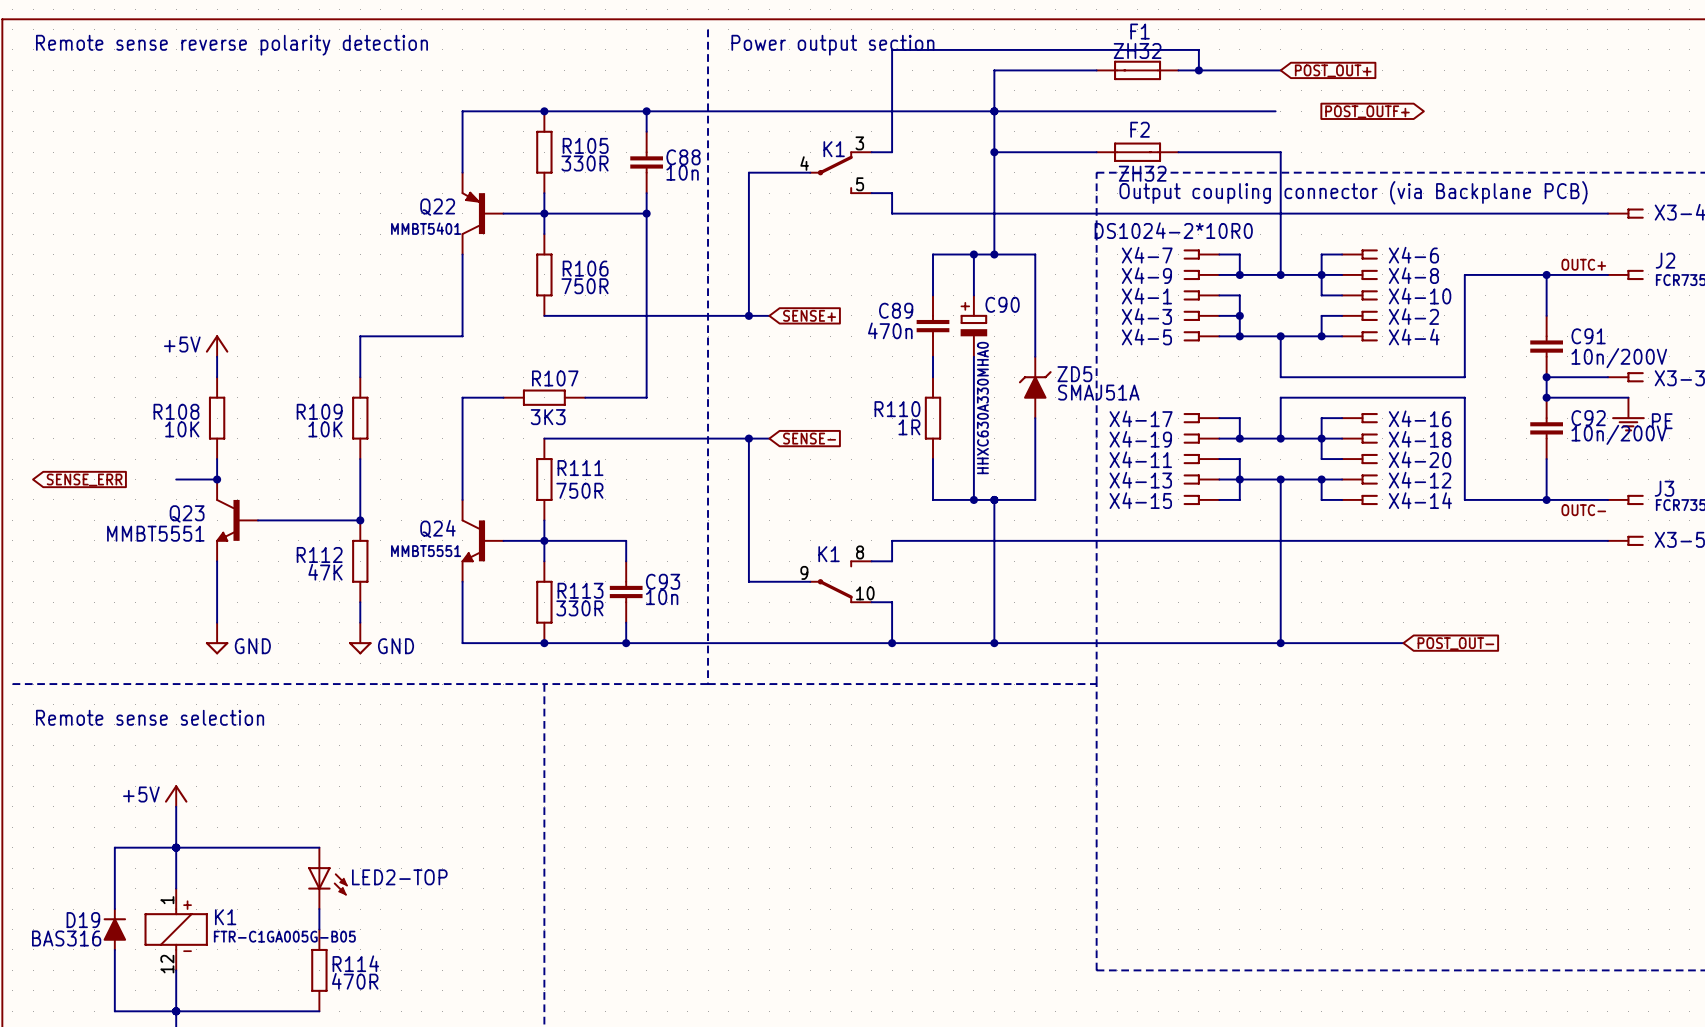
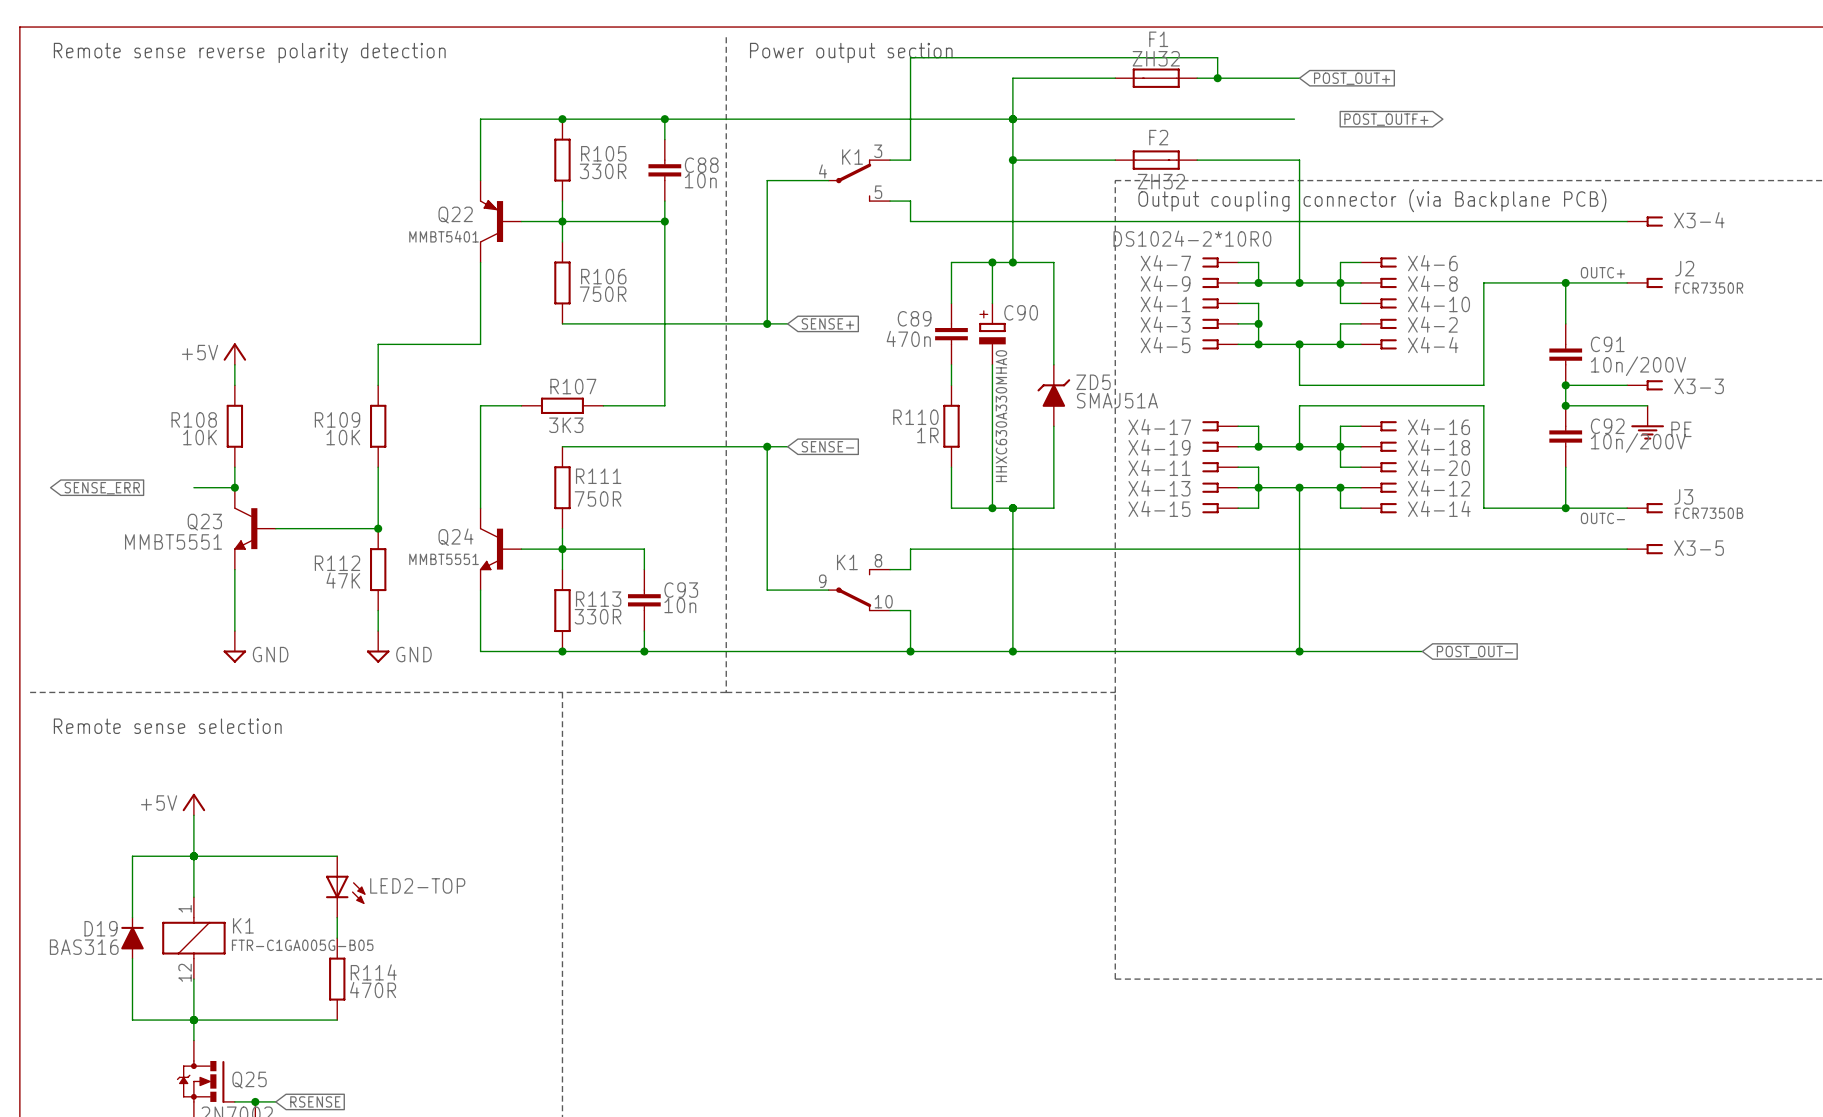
K1 text: + (187, 905) -> none
K1 text: - (187, 951) -> none

